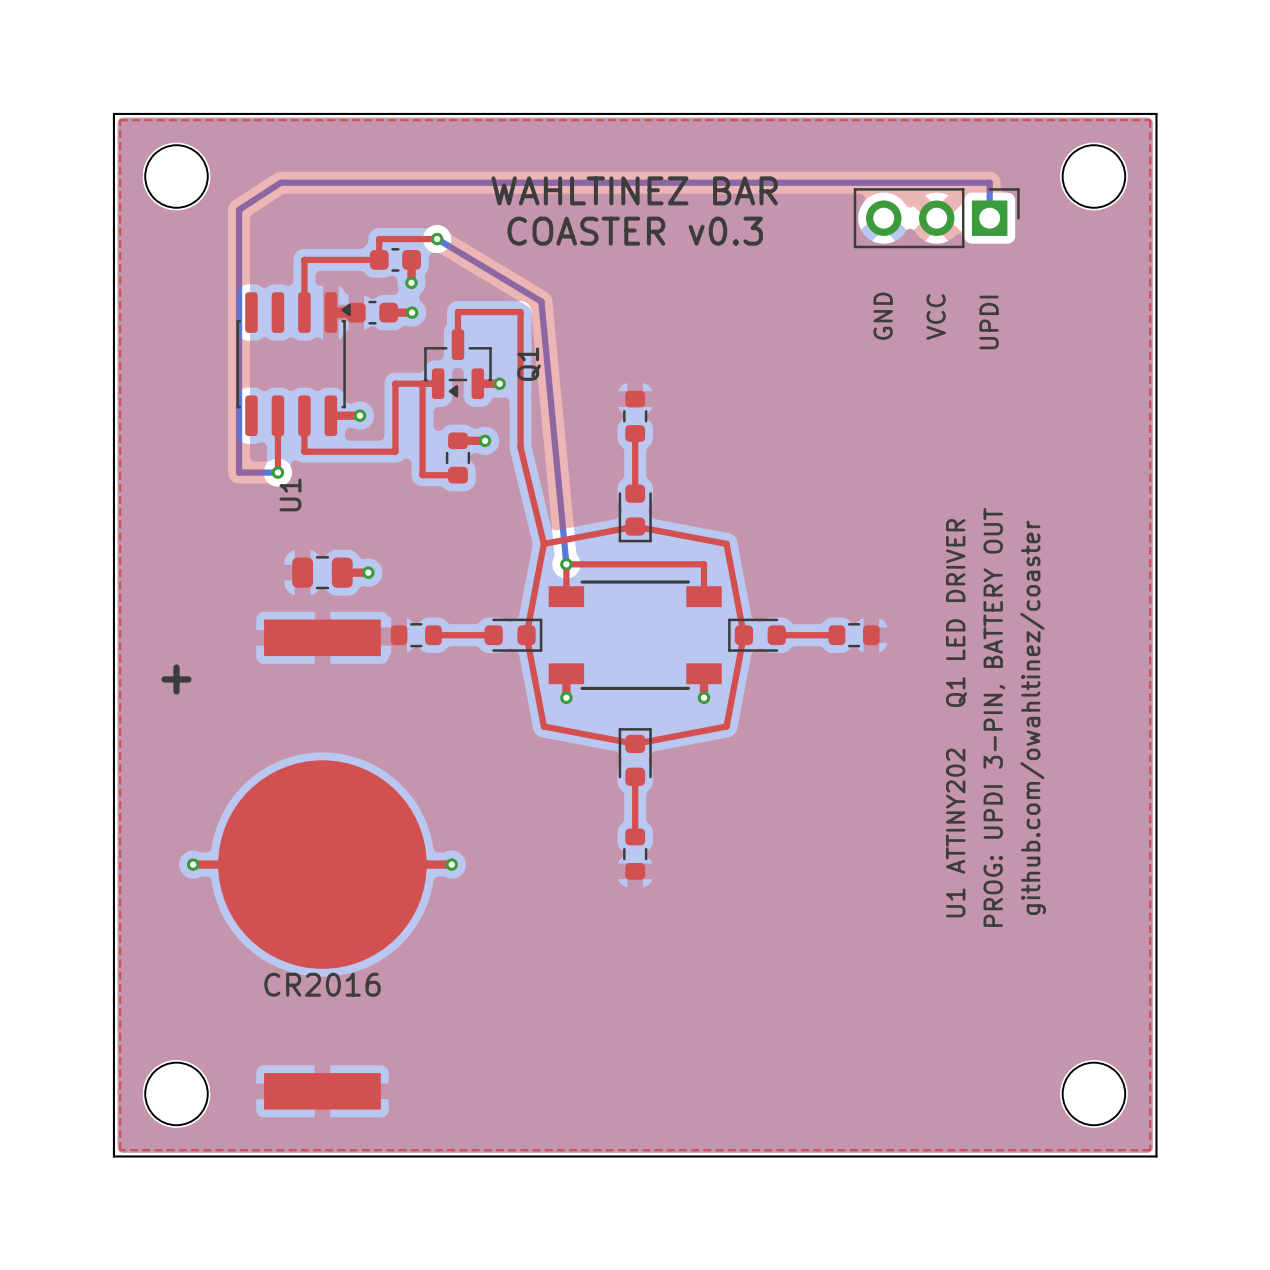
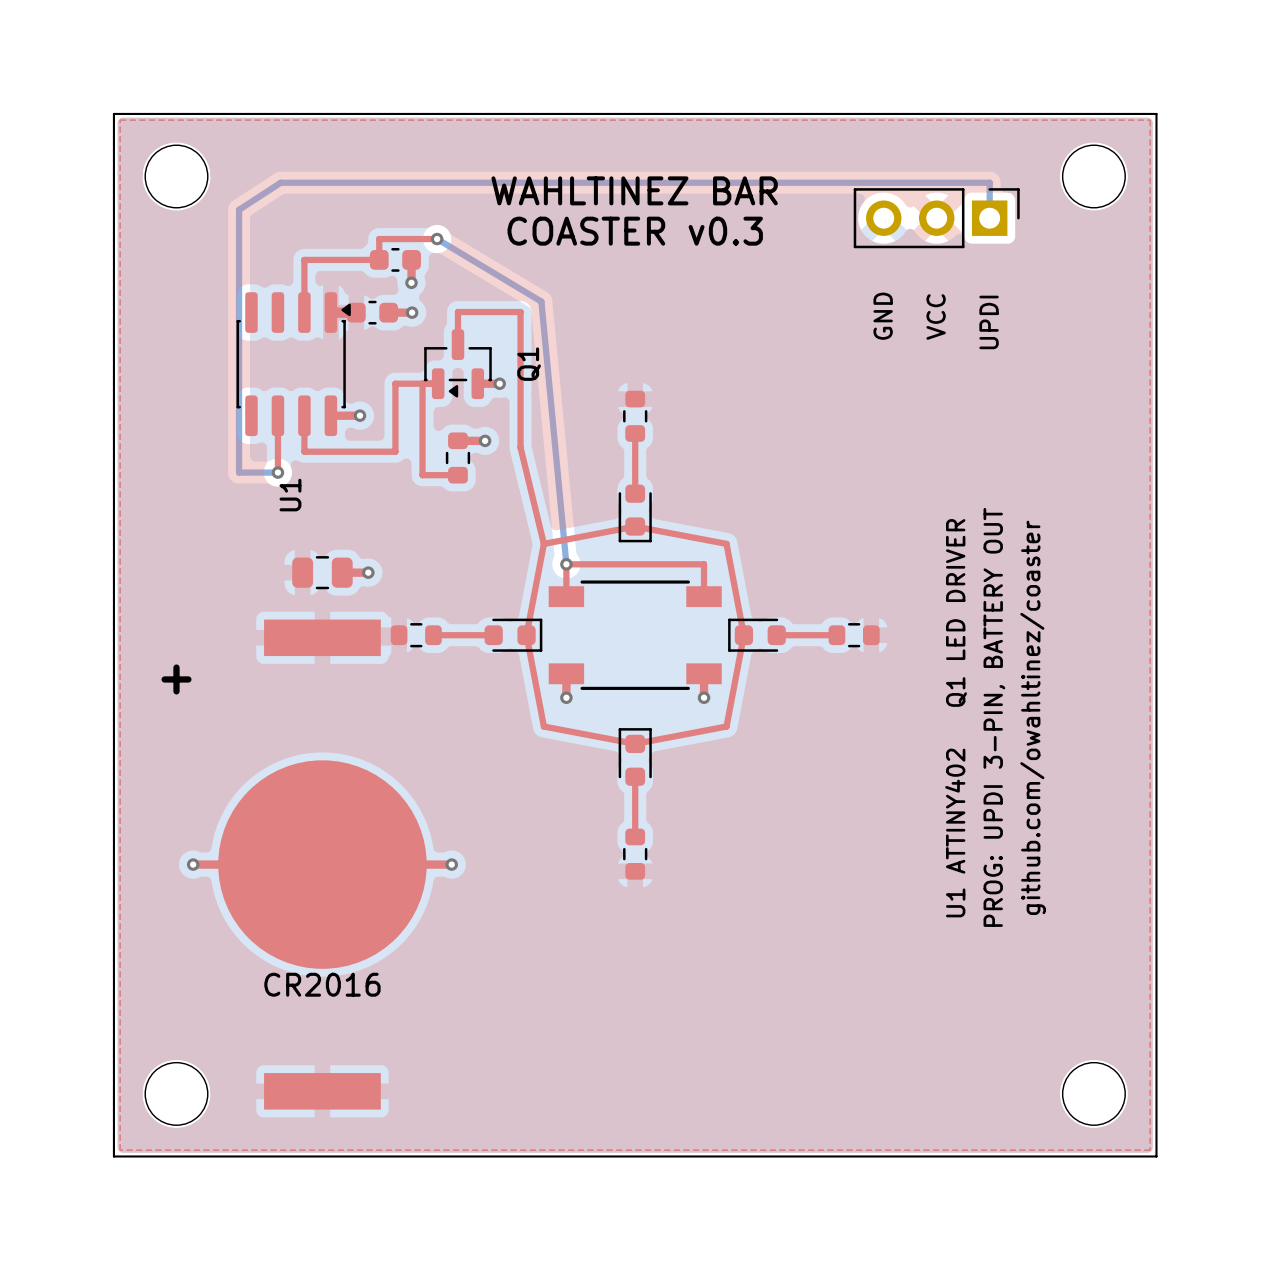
text: U1 ATTINY202 Q1 LED DRIVER (956, 718) -> U1 ATTINY402 Q1 LED DRIVER (956, 718)

